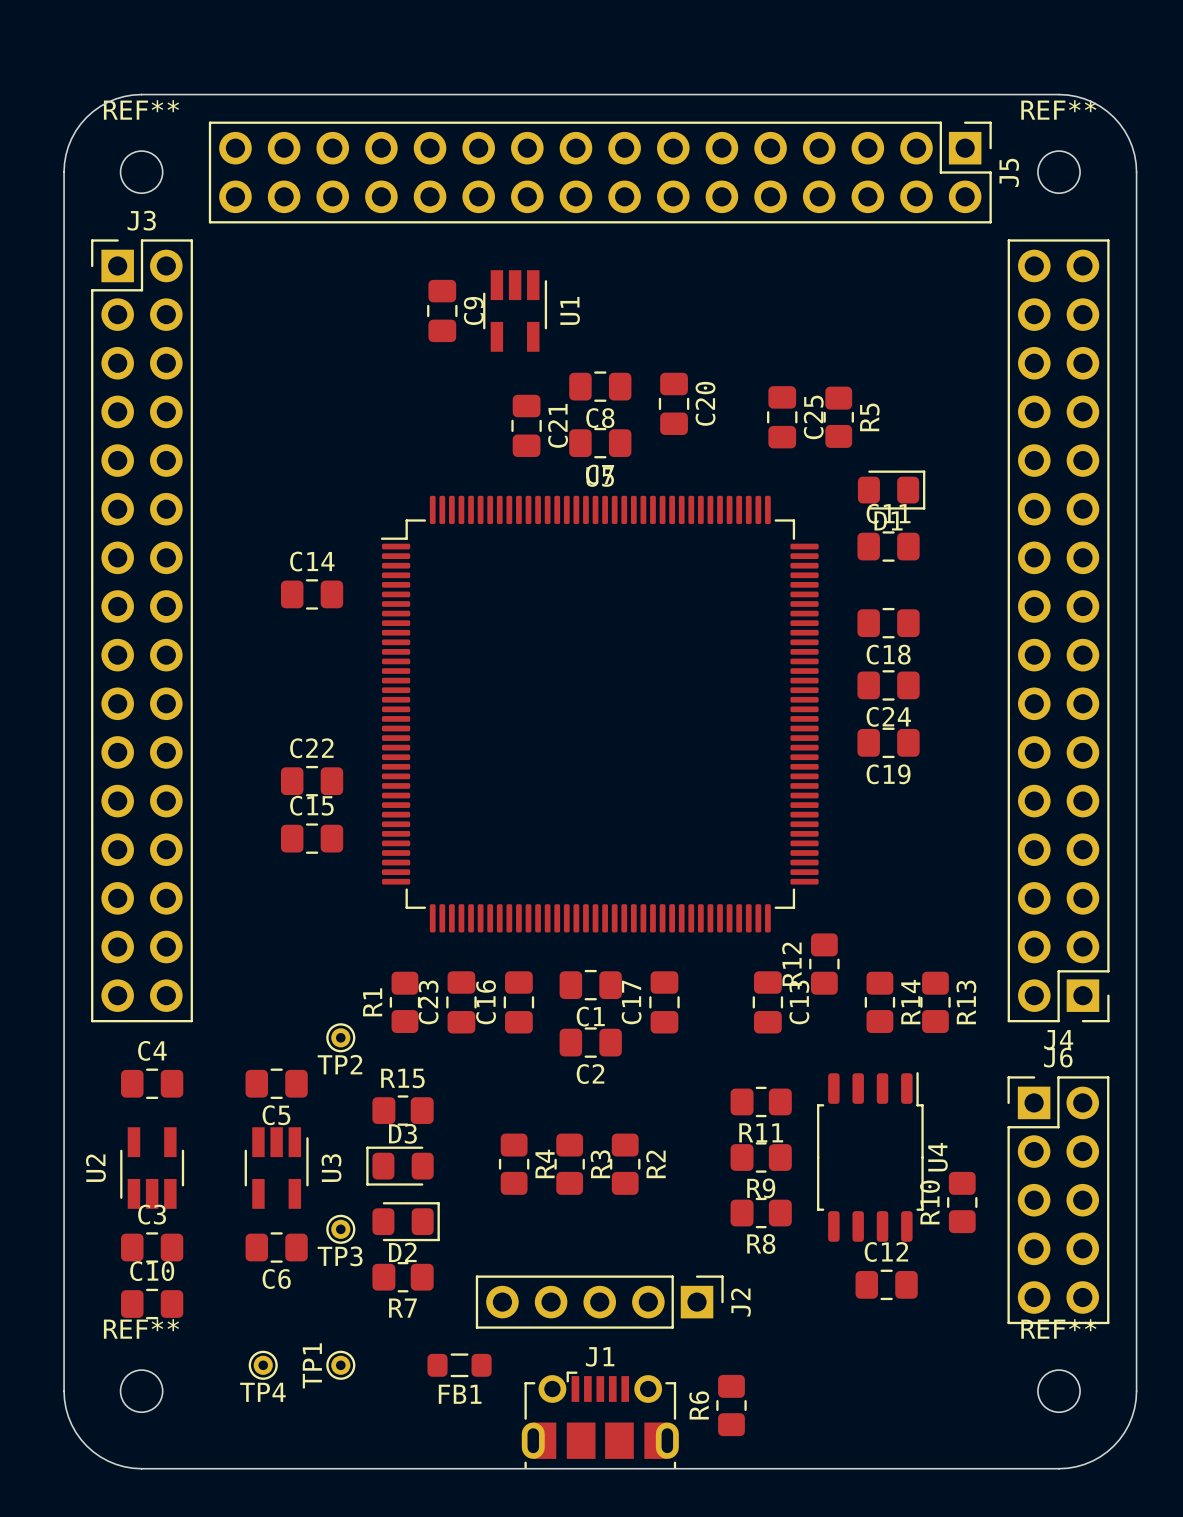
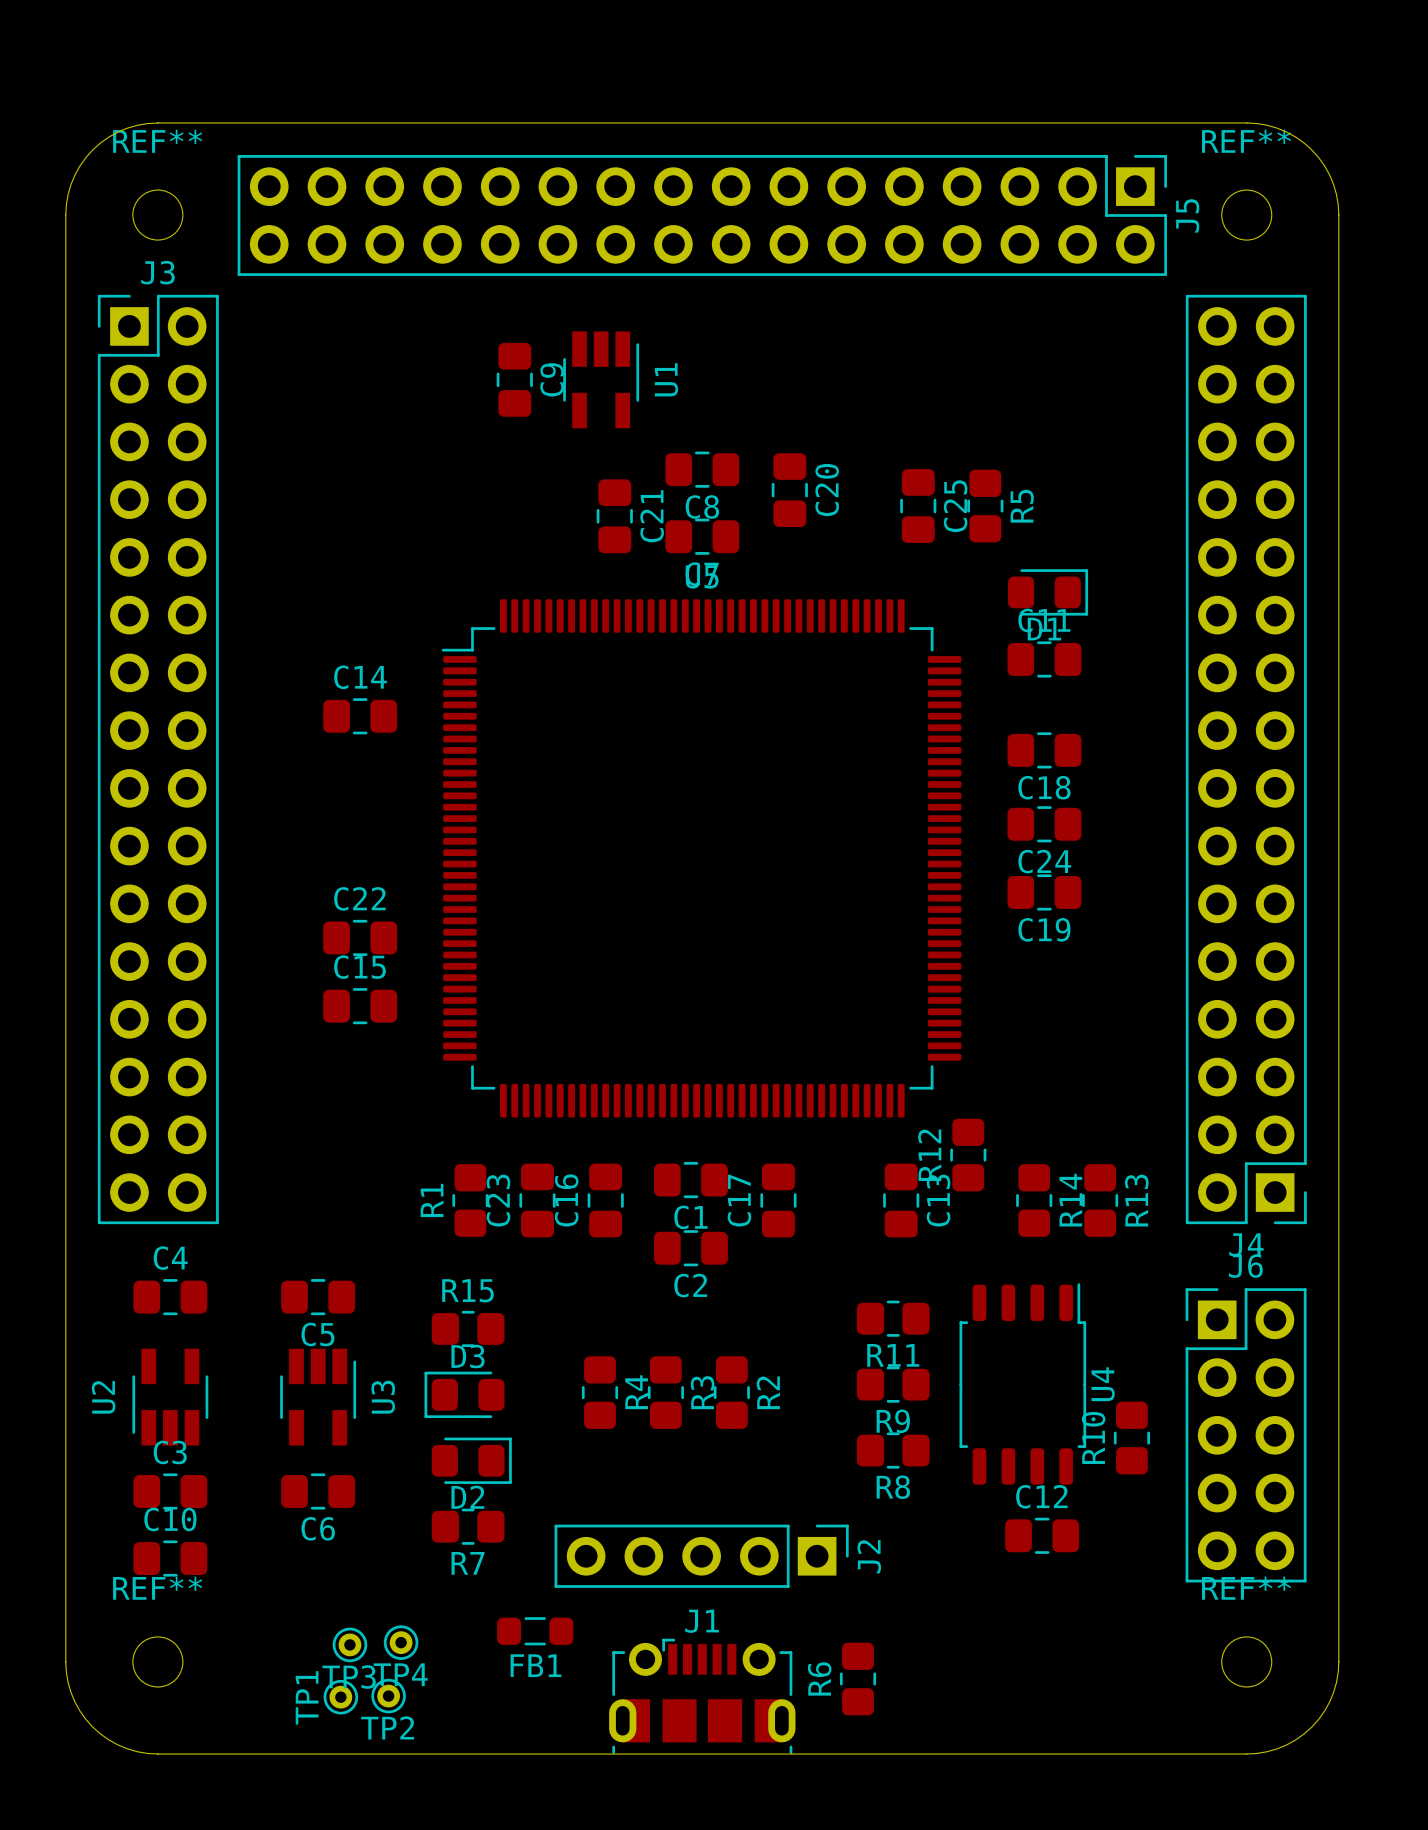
TP2 position: (340, 1037) -> (388, 1696)
TP3 position: (340, 1229) -> (349, 1644)
TP4 position: (263, 1365) -> (401, 1642)
TP1 position: (340, 1365) -> (340, 1697)

